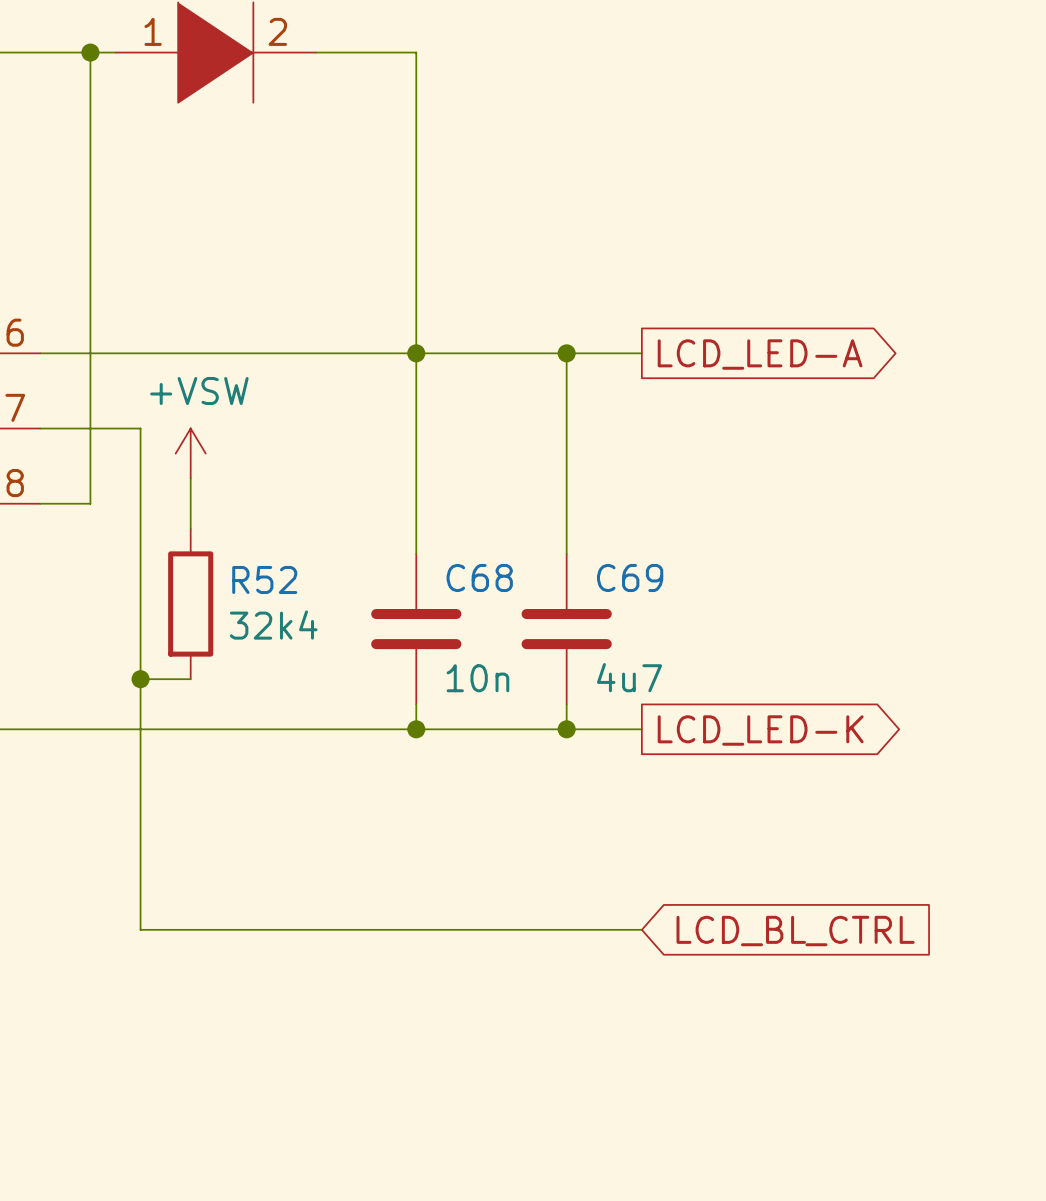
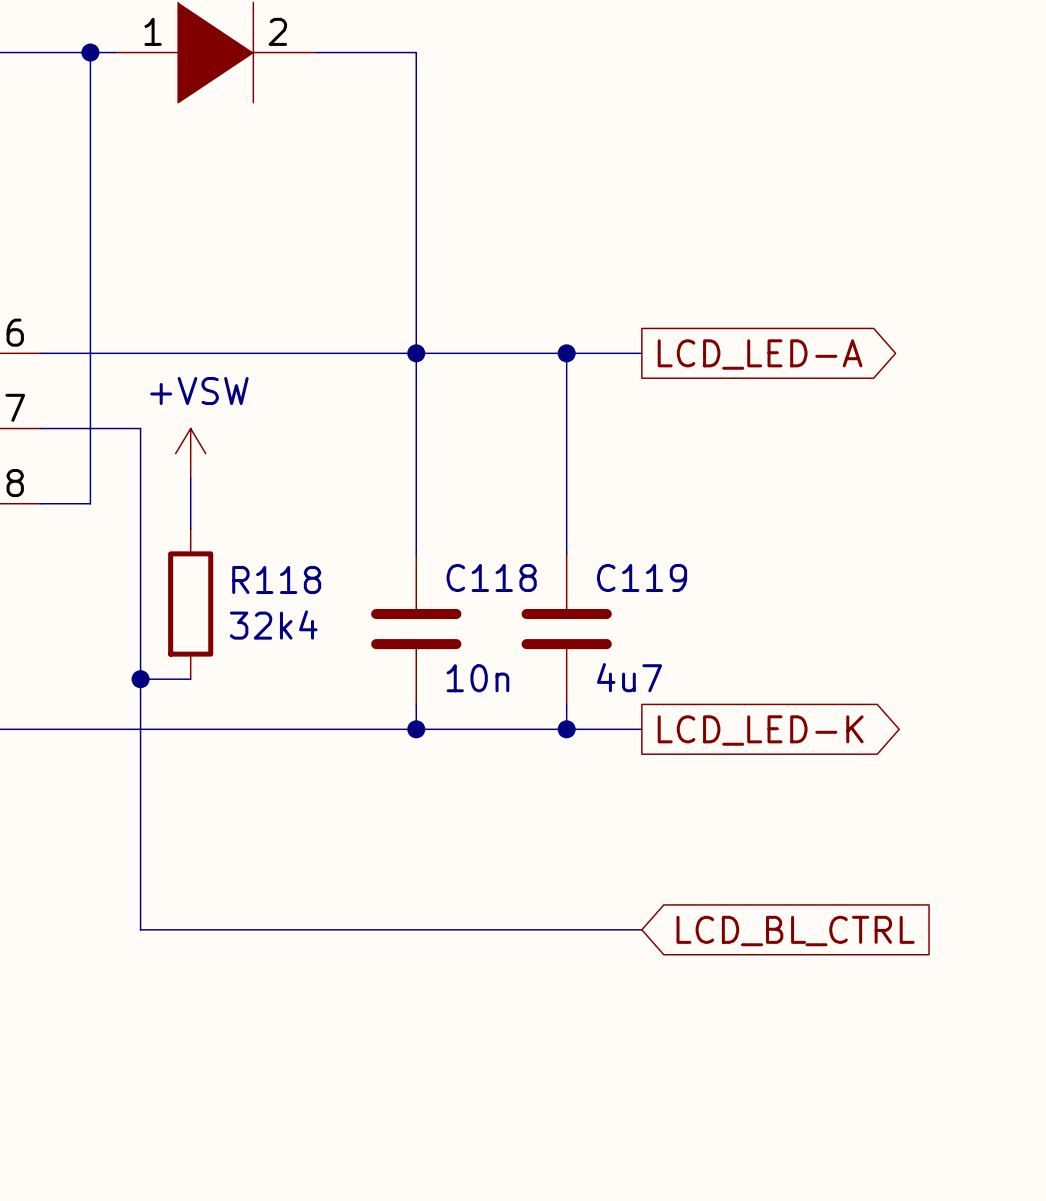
C68 name: C68 (479, 577) -> C118 (491, 577)
C69 name: C69 (630, 577) -> C119 (642, 577)
R52 name: R52 (264, 579) -> R118 (276, 579)

